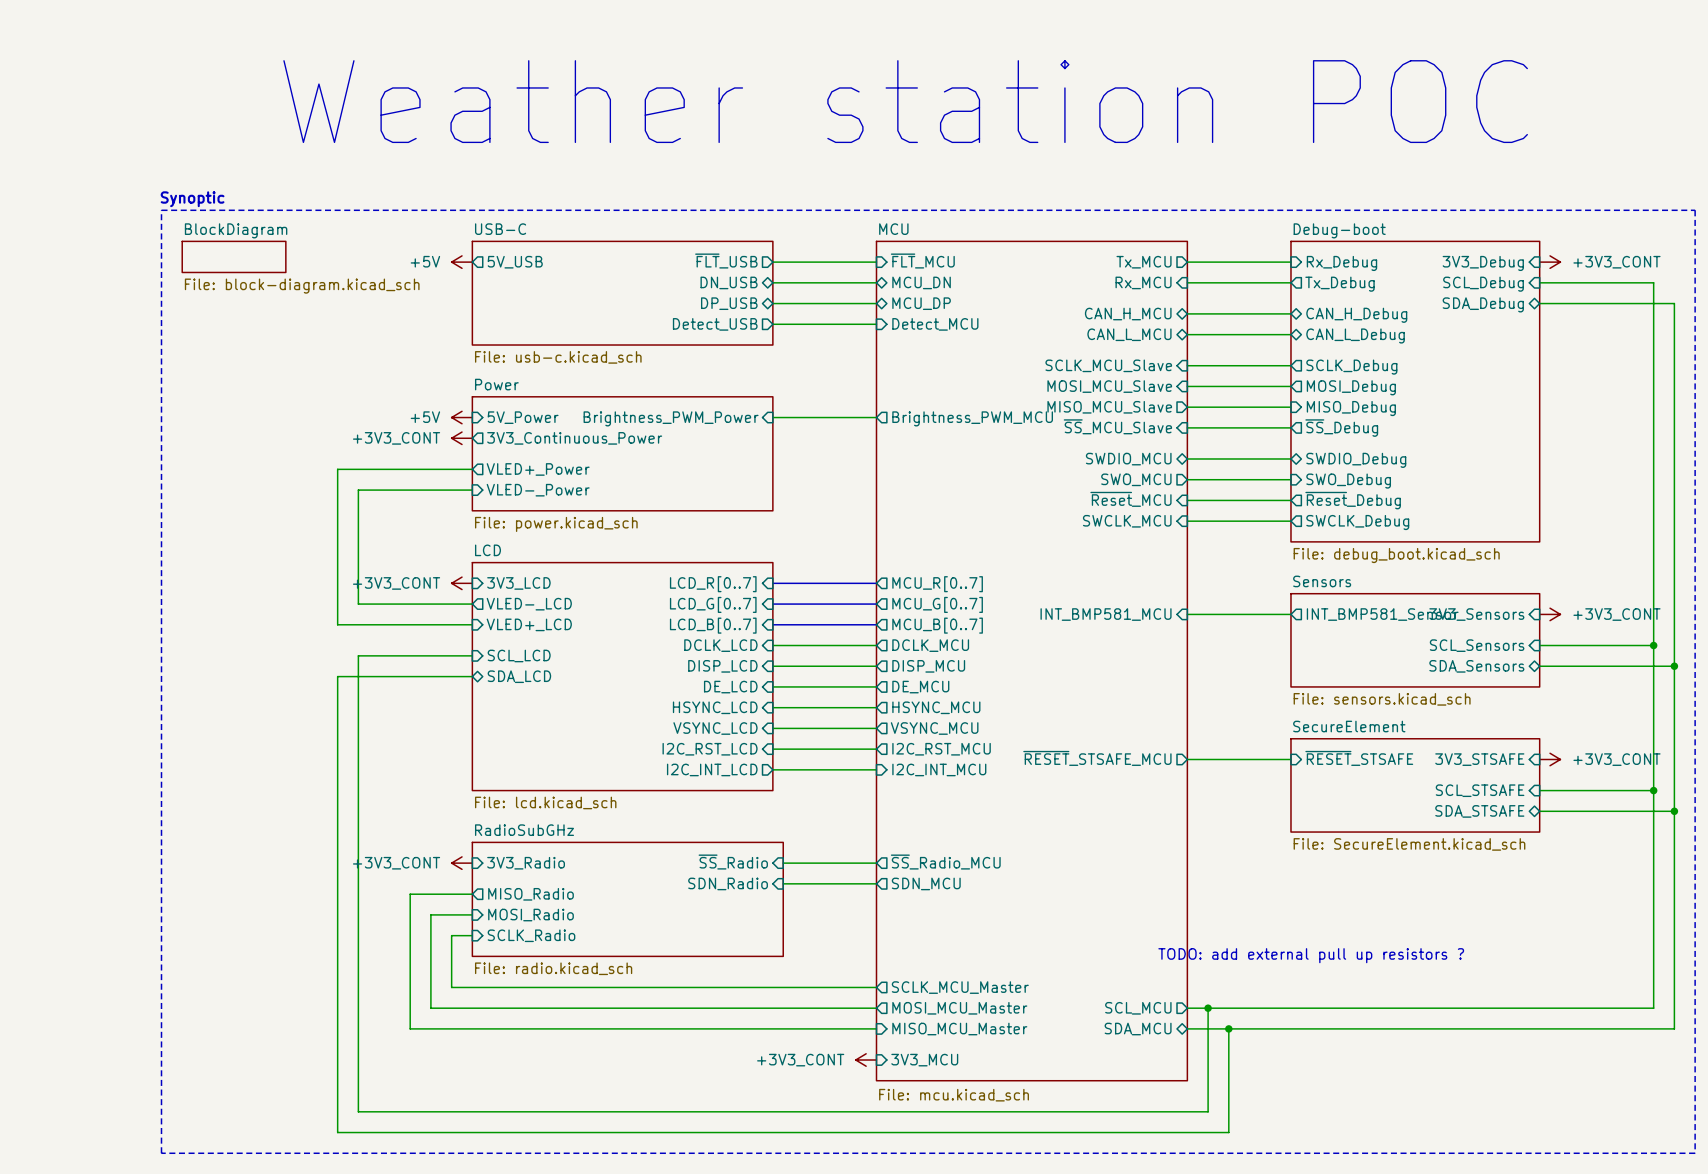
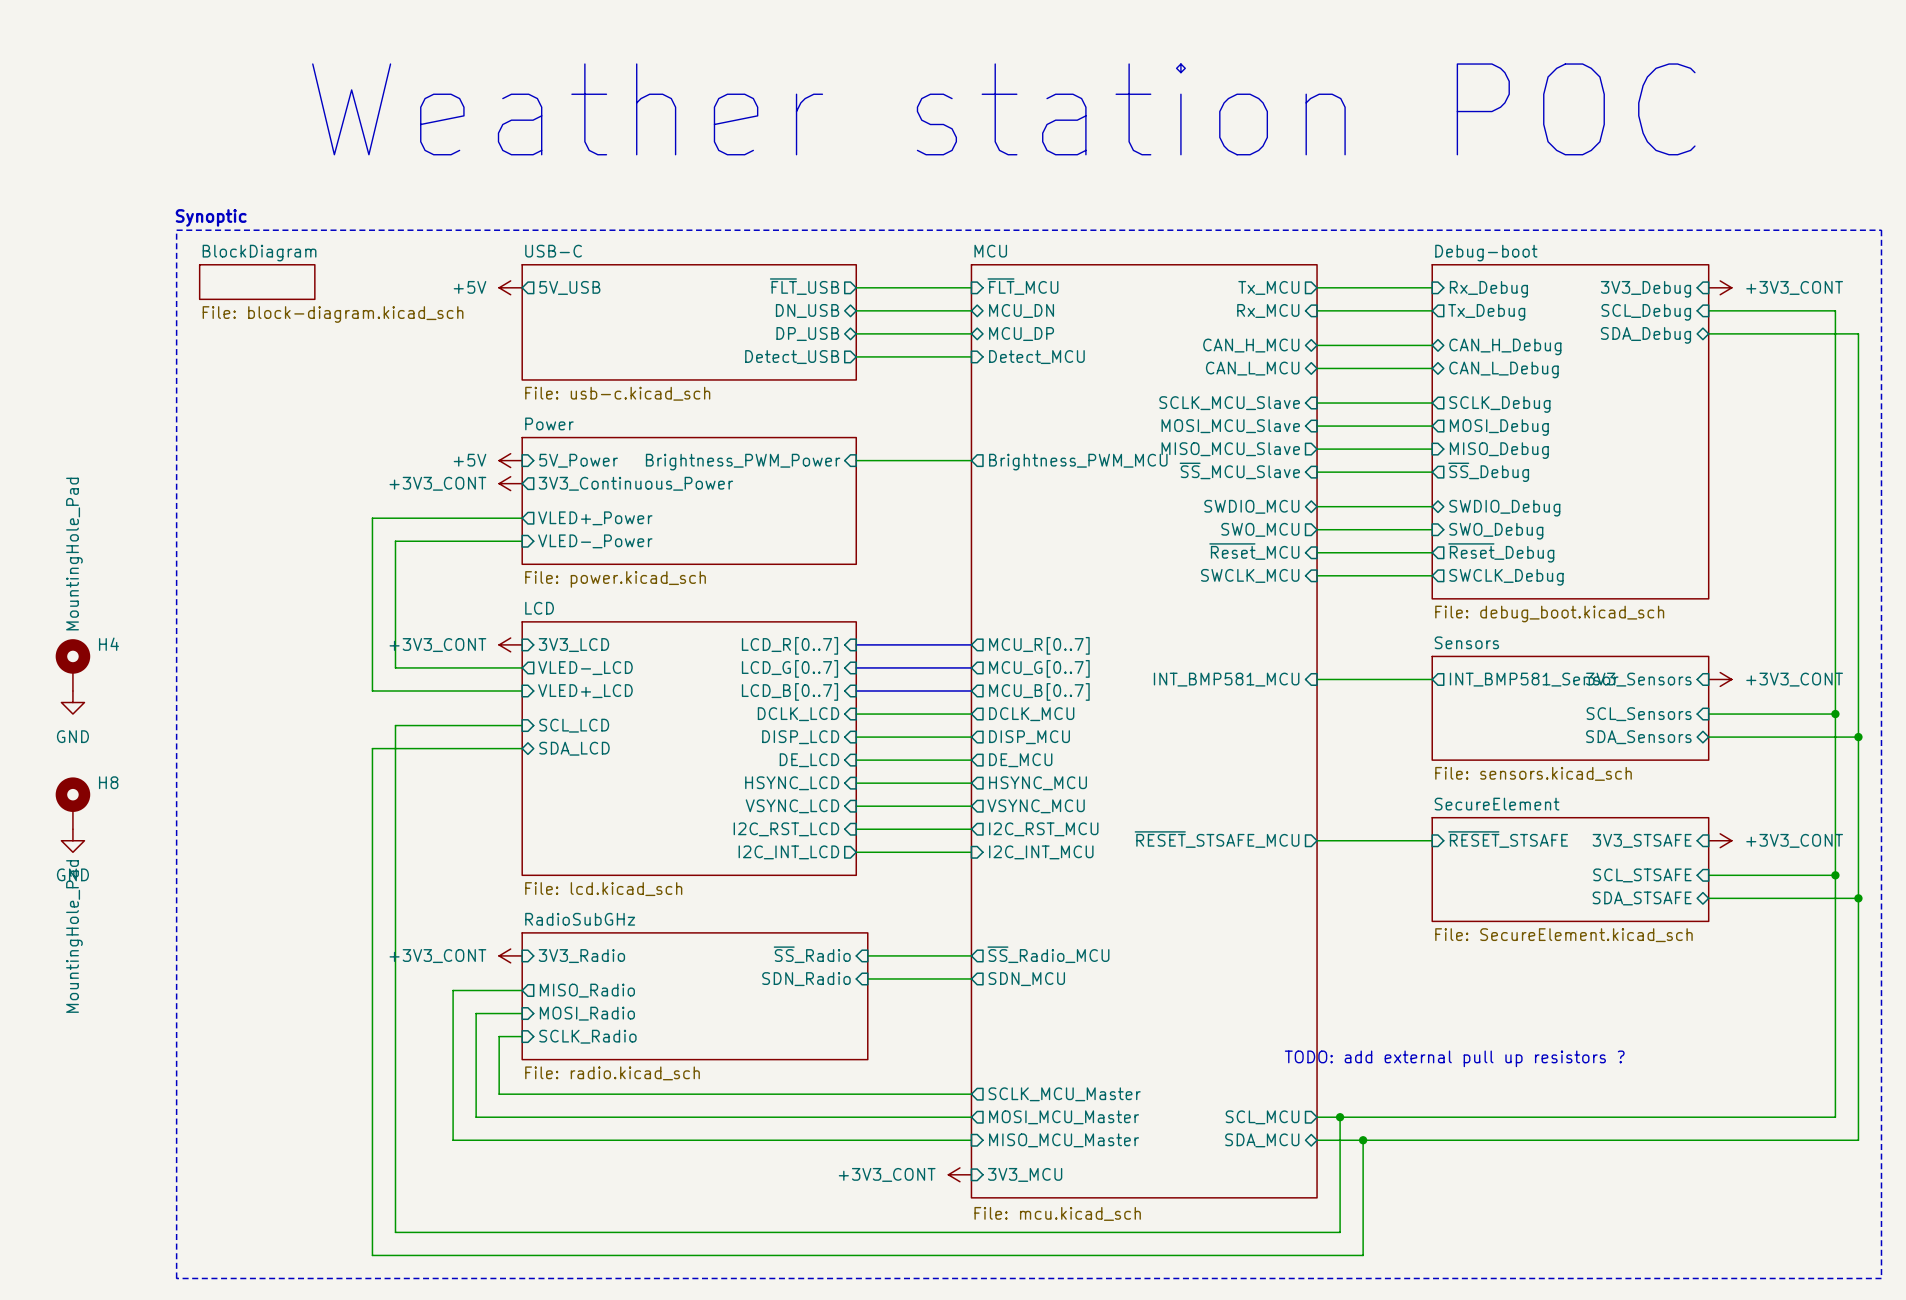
H4: none -> MountingHole_Pad (72, 665)
power symbol: none -> GND (72, 702)
H8: none -> MountingHole_Pad (72, 803)
power symbol: none -> GND (72, 840)

